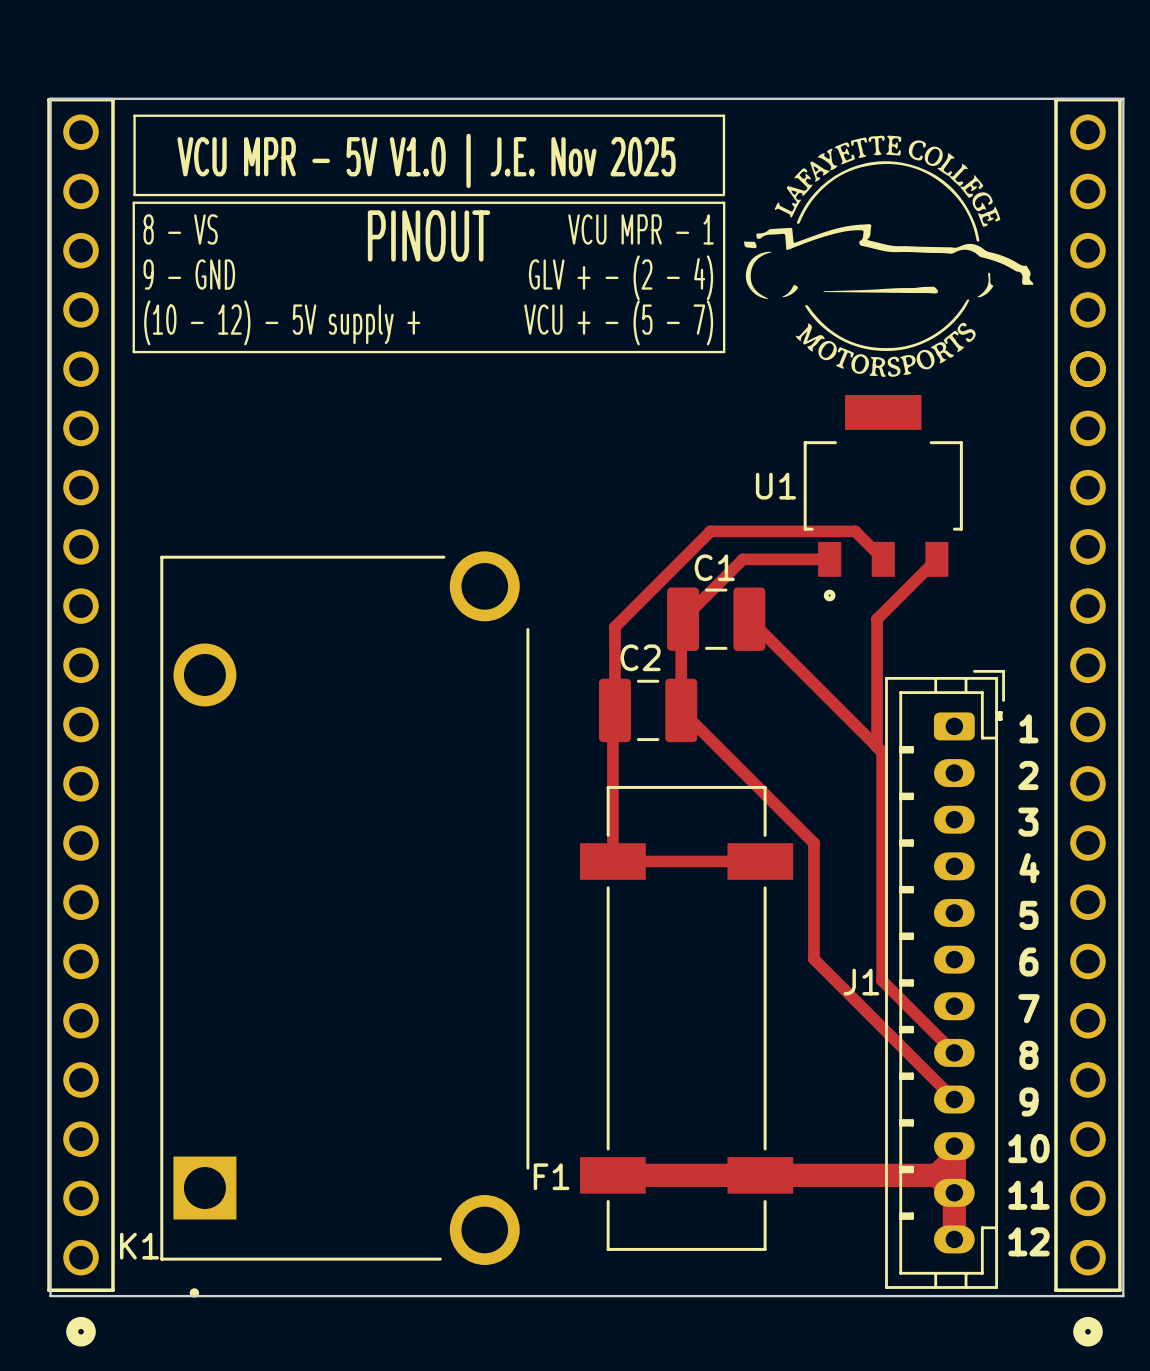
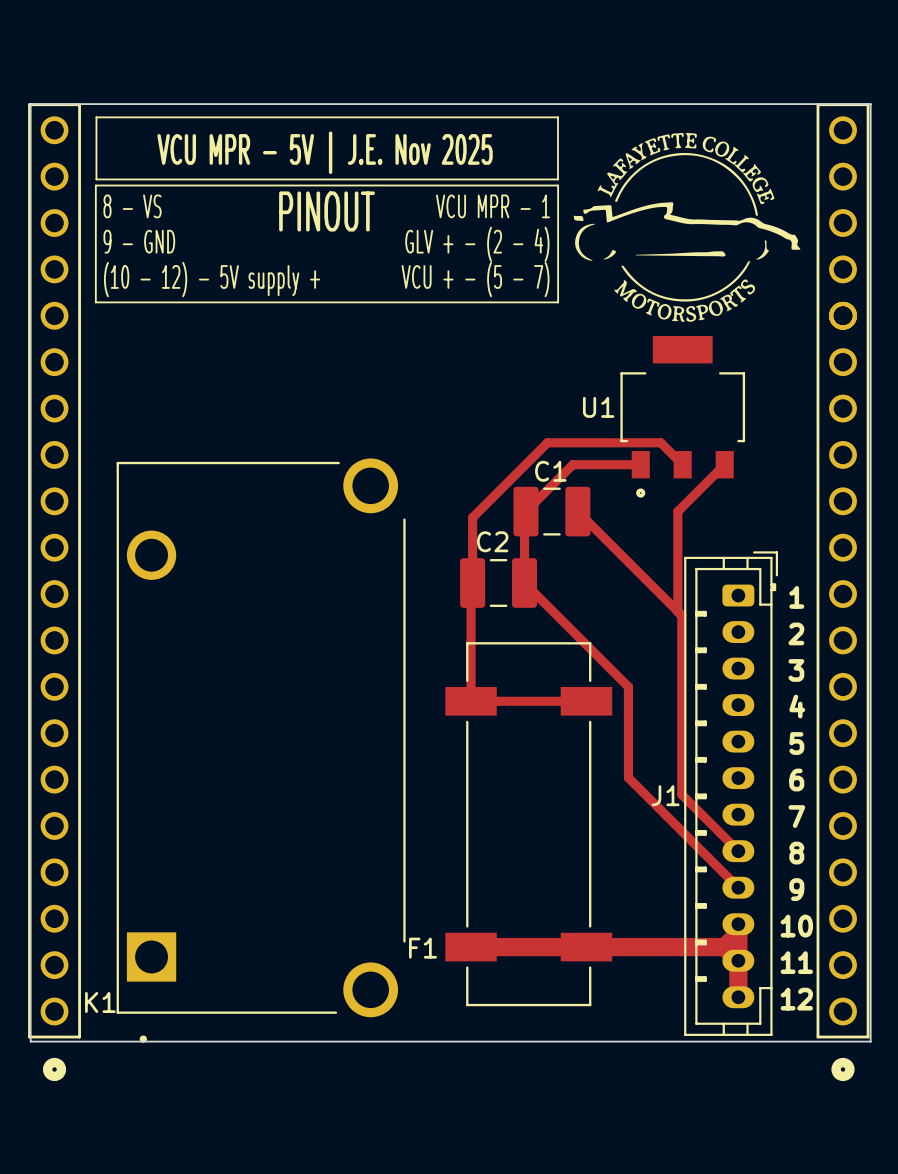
text: VCU MPR - 5V V1.0 | J.E. Nov 2025 (426, 160) -> VCU MPR - 5V | J.E. Nov 2025 (325, 152)

